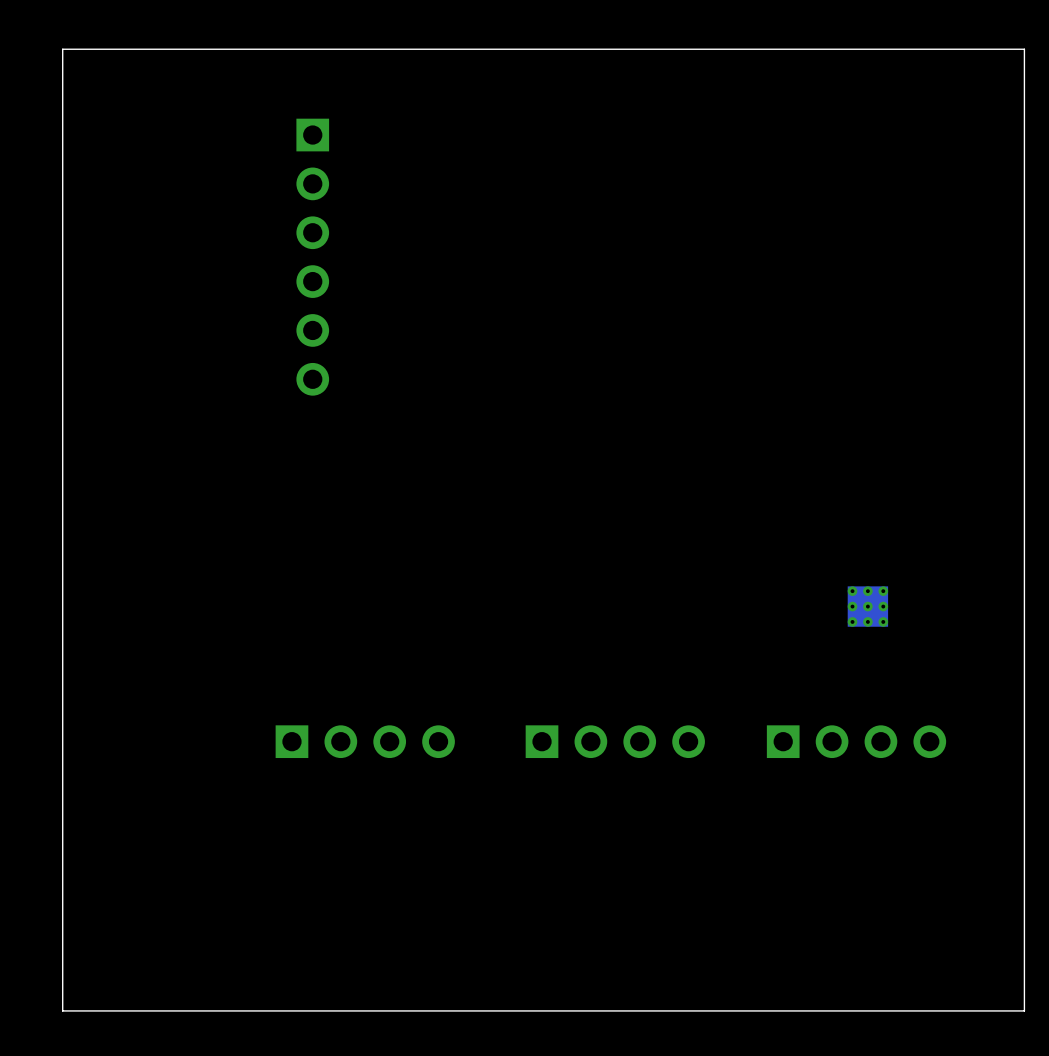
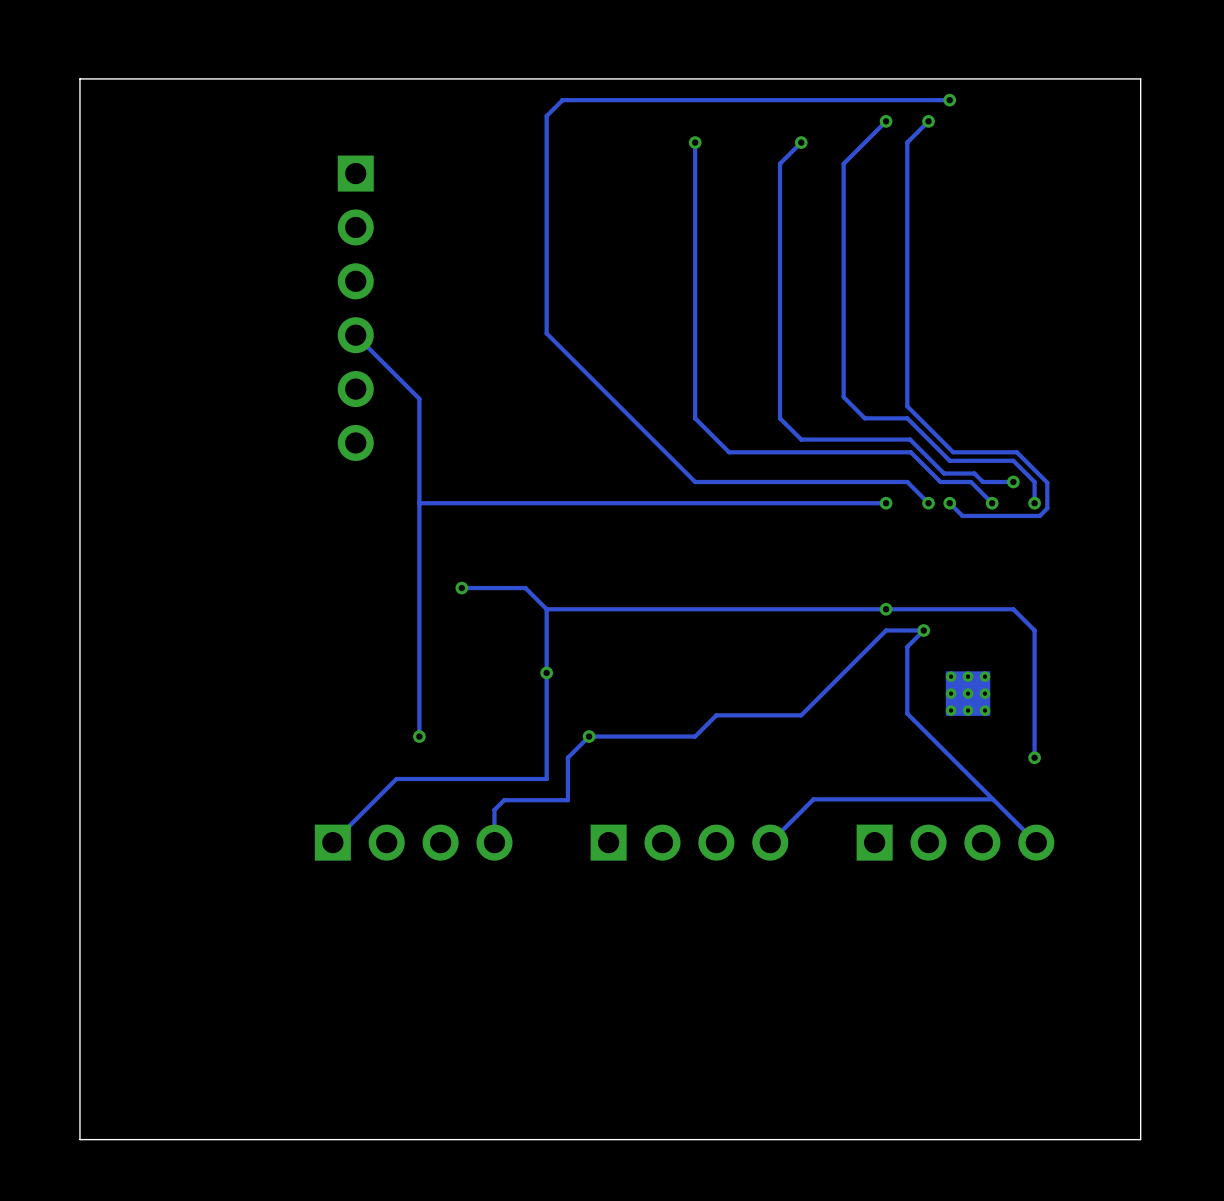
track: none -> (949, 100) (562, 100) (546, 116) (546, 333) (695, 481) (907, 481) (928, 503)
via: none -> (949, 100)
track: none -> (886, 121) (843, 163) (843, 397) (864, 418) (907, 418) (949, 460) (1013, 460) (1034, 481) (1034, 503)
via: none -> (886, 121)
track: none -> (928, 121) (907, 142) (907, 406) (953, 452) (1016, 452) (1047, 482) (1047, 508) (1039, 515) (962, 515) (949, 503)
via: none -> (928, 121)
track: none -> (695, 142) (695, 418) (729, 452) (910, 452) (940, 481) (970, 481) (992, 503)
via: none -> (695, 142)
track: none -> (801, 142) (780, 163) (780, 418) (801, 439) (910, 439) (944, 473) (974, 473) (982, 481) (1013, 481)
via: none -> (801, 142)
track: none -> (355, 335) (419, 398) (419, 736)
via: none -> (1013, 481)
track: none -> (886, 503) (419, 503)
via: none -> (886, 503)
via: none -> (928, 503)
via: none -> (949, 503)
via: none -> (992, 503)
via: none -> (1034, 503)
track: none -> (461, 588) (525, 588) (546, 609)
via: none -> (461, 588)
track: none -> (546, 609) (546, 778) (396, 778) (332, 842)
track: none -> (546, 609) (1013, 609) (1034, 630) (1034, 757)
via: none -> (886, 609)
via: none -> (923, 630)
via: none -> (546, 672)
via: none -> (419, 736)
via: none -> (589, 736)
via: none -> (1034, 757)
track: none -> (993, 799) (813, 799) (770, 842)
track: none -> (1036, 842) (907, 713) (907, 646) (923, 630) (886, 630) (801, 715) (716, 715) (695, 736) (589, 736) (567, 757) (567, 800) (504, 800) (494, 809) (494, 842)

